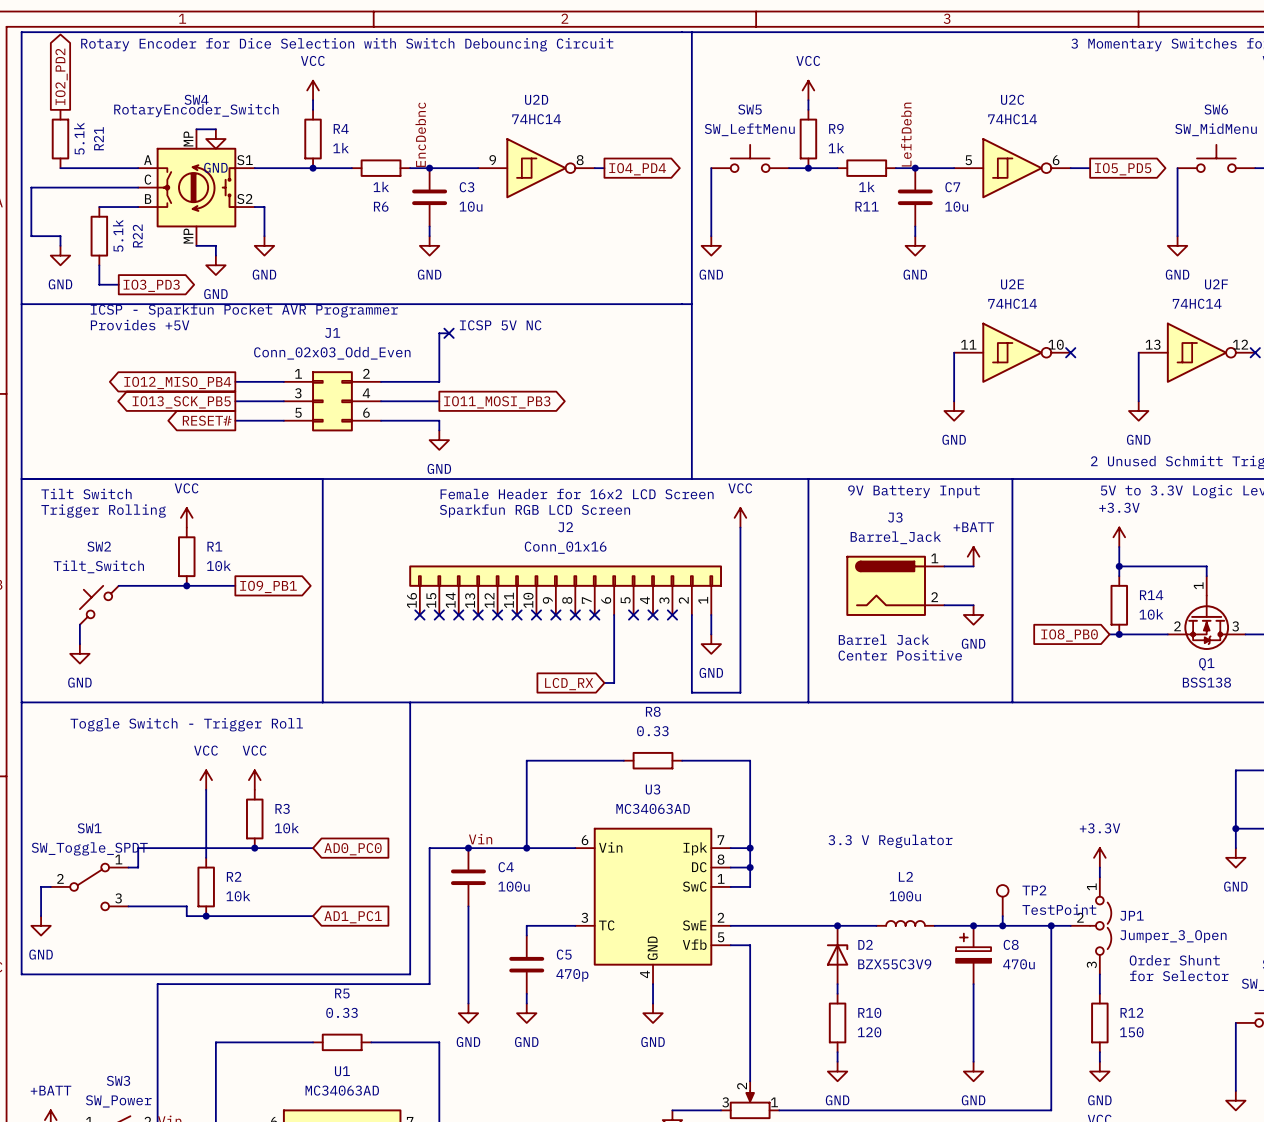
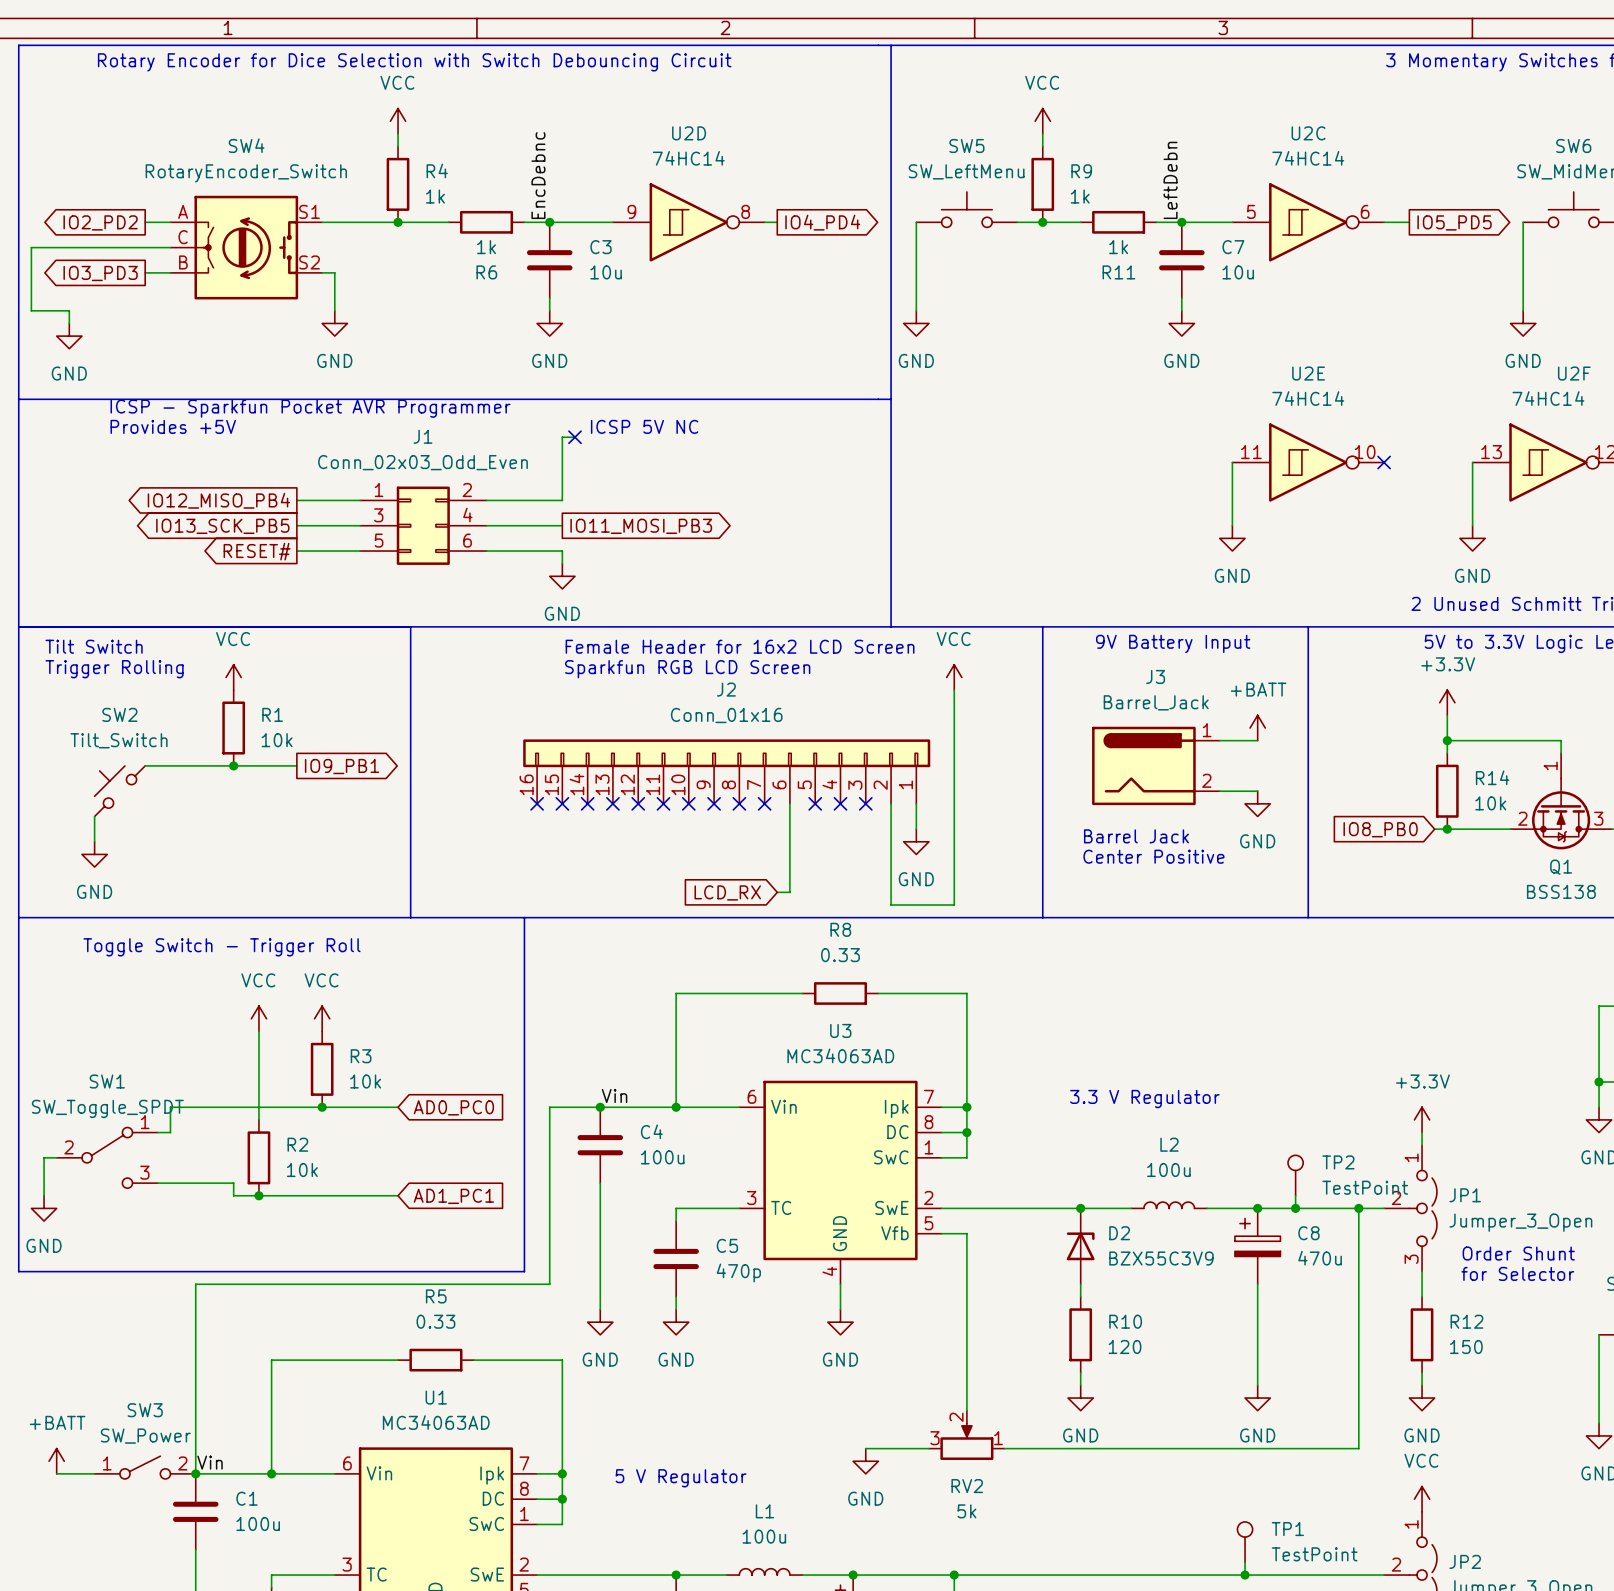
global label rotation: 0° (61, 76) -> 90° counterclockwise (100, 222)
global label position: IO2_PD2 (61, 76) -> IO2_PD2 (100, 222)
SW4 value position: RotaryEncoder_Switch (196, 110) -> RotaryEncoder_Switch (246, 173)
SW4 symbol: [138, 129, 255, 246] -> [170, 195, 323, 300]
wire: (196, 129) (215, 129) -> none
R21: 5.1k (60, 139) -> none
power symbol: GND (215, 139) -> none
wire: (60, 168) (118, 168) -> none
wire: (99, 207) (118, 207) -> none
R22: 5.1k (99, 236) -> none
wire: (196, 245) (215, 245) (215, 255) -> none
wire: (99, 265) (99, 284) (118, 284) -> none
power symbol: GND (215, 265) -> none
global label rotation: 0° (151, 285) -> 180° (100, 273)
global label position: IO3_PD3 (151, 285) -> IO3_PD3 (100, 273)

